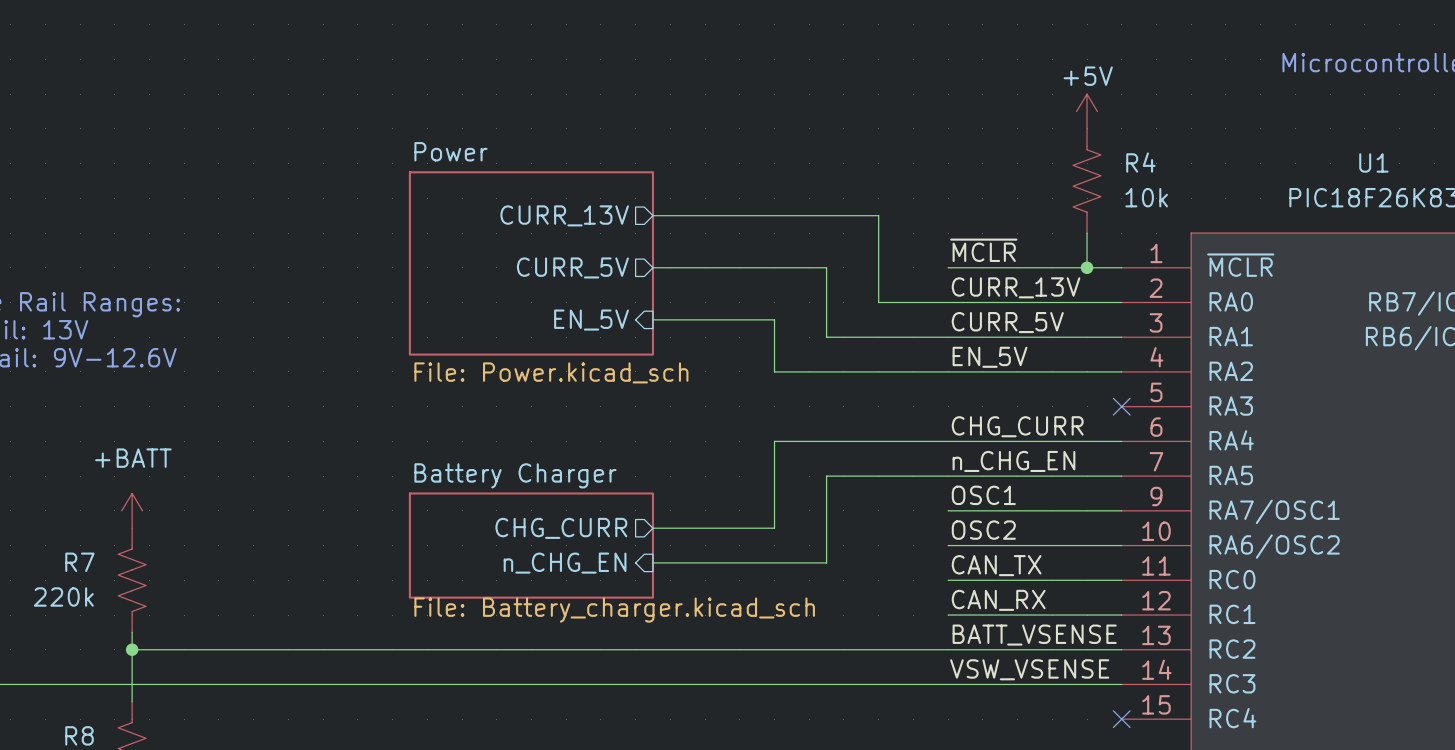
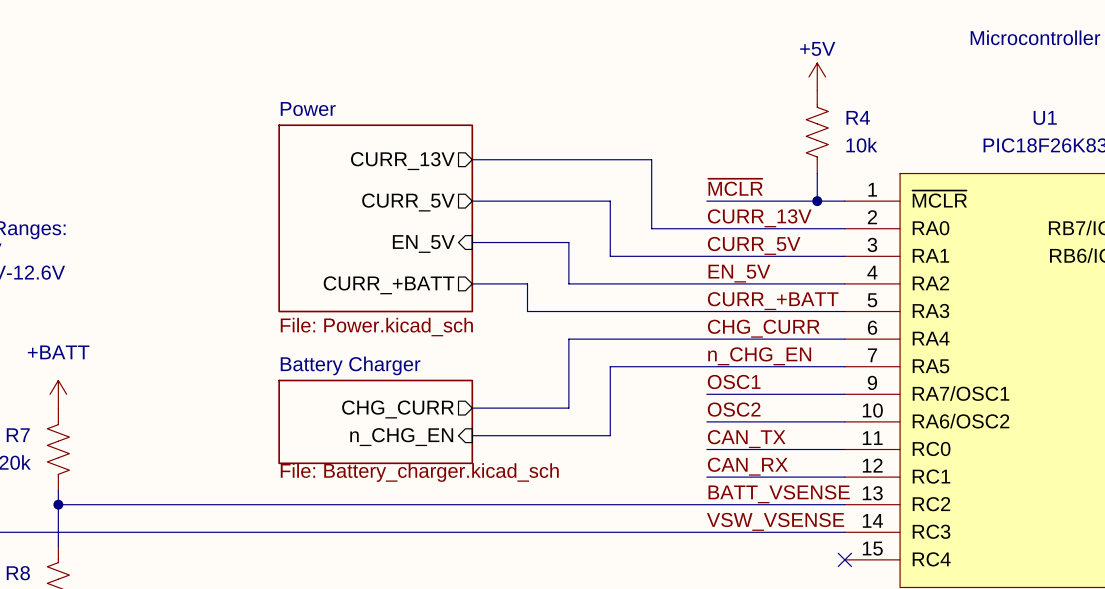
sheet Power: File: Power.kicad_sch (531, 263) -> none
sheet Power: none -> File: Power.kicad_sch (375, 218)
wire: none -> (472, 283) (527, 283) (527, 311) (844, 311)
sheet pin: none -> CURR_+BATT (389, 285)
label: none -> CURR_+BATT (773, 301)
no-connect mark: (1121, 406) -> none

